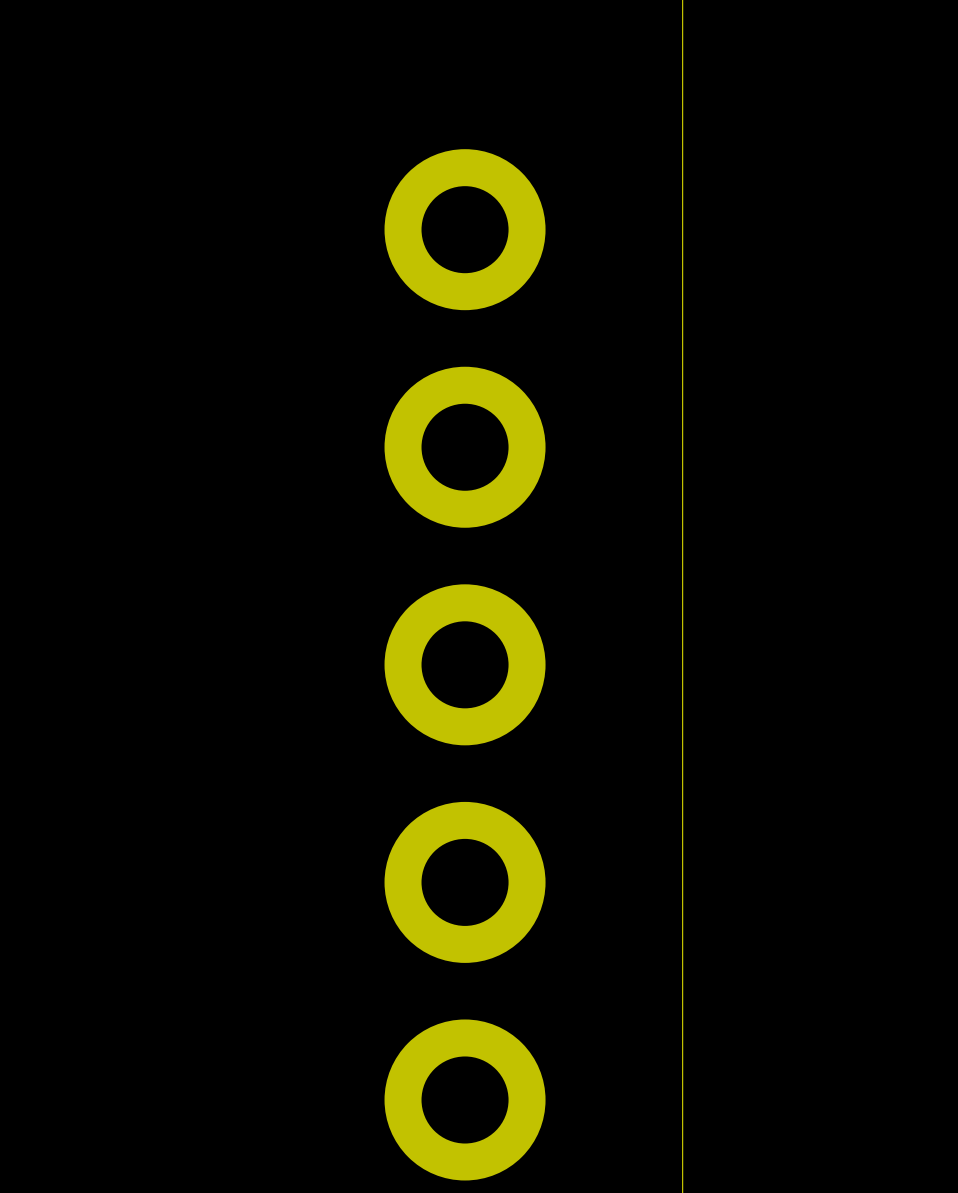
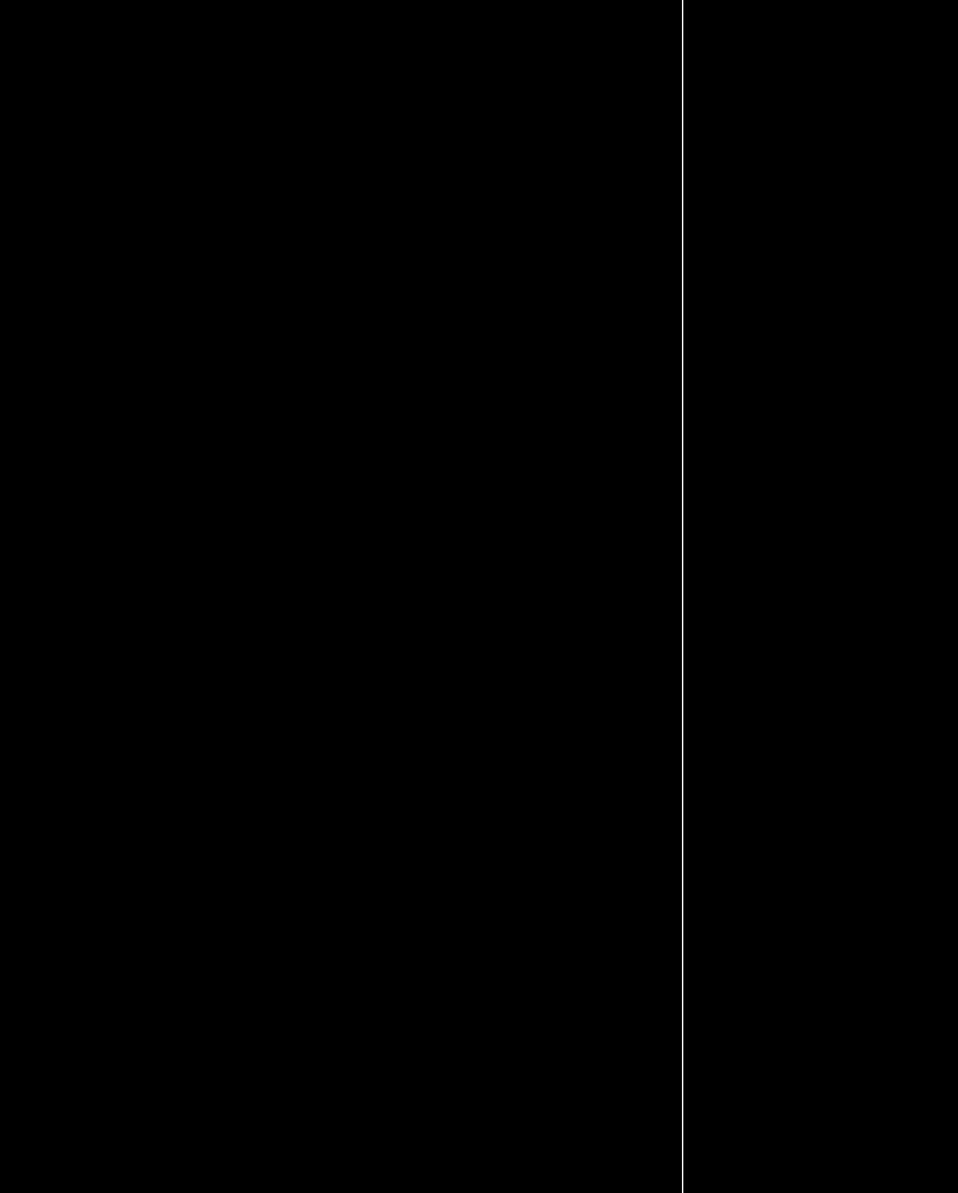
part: (465, 664) -> none

